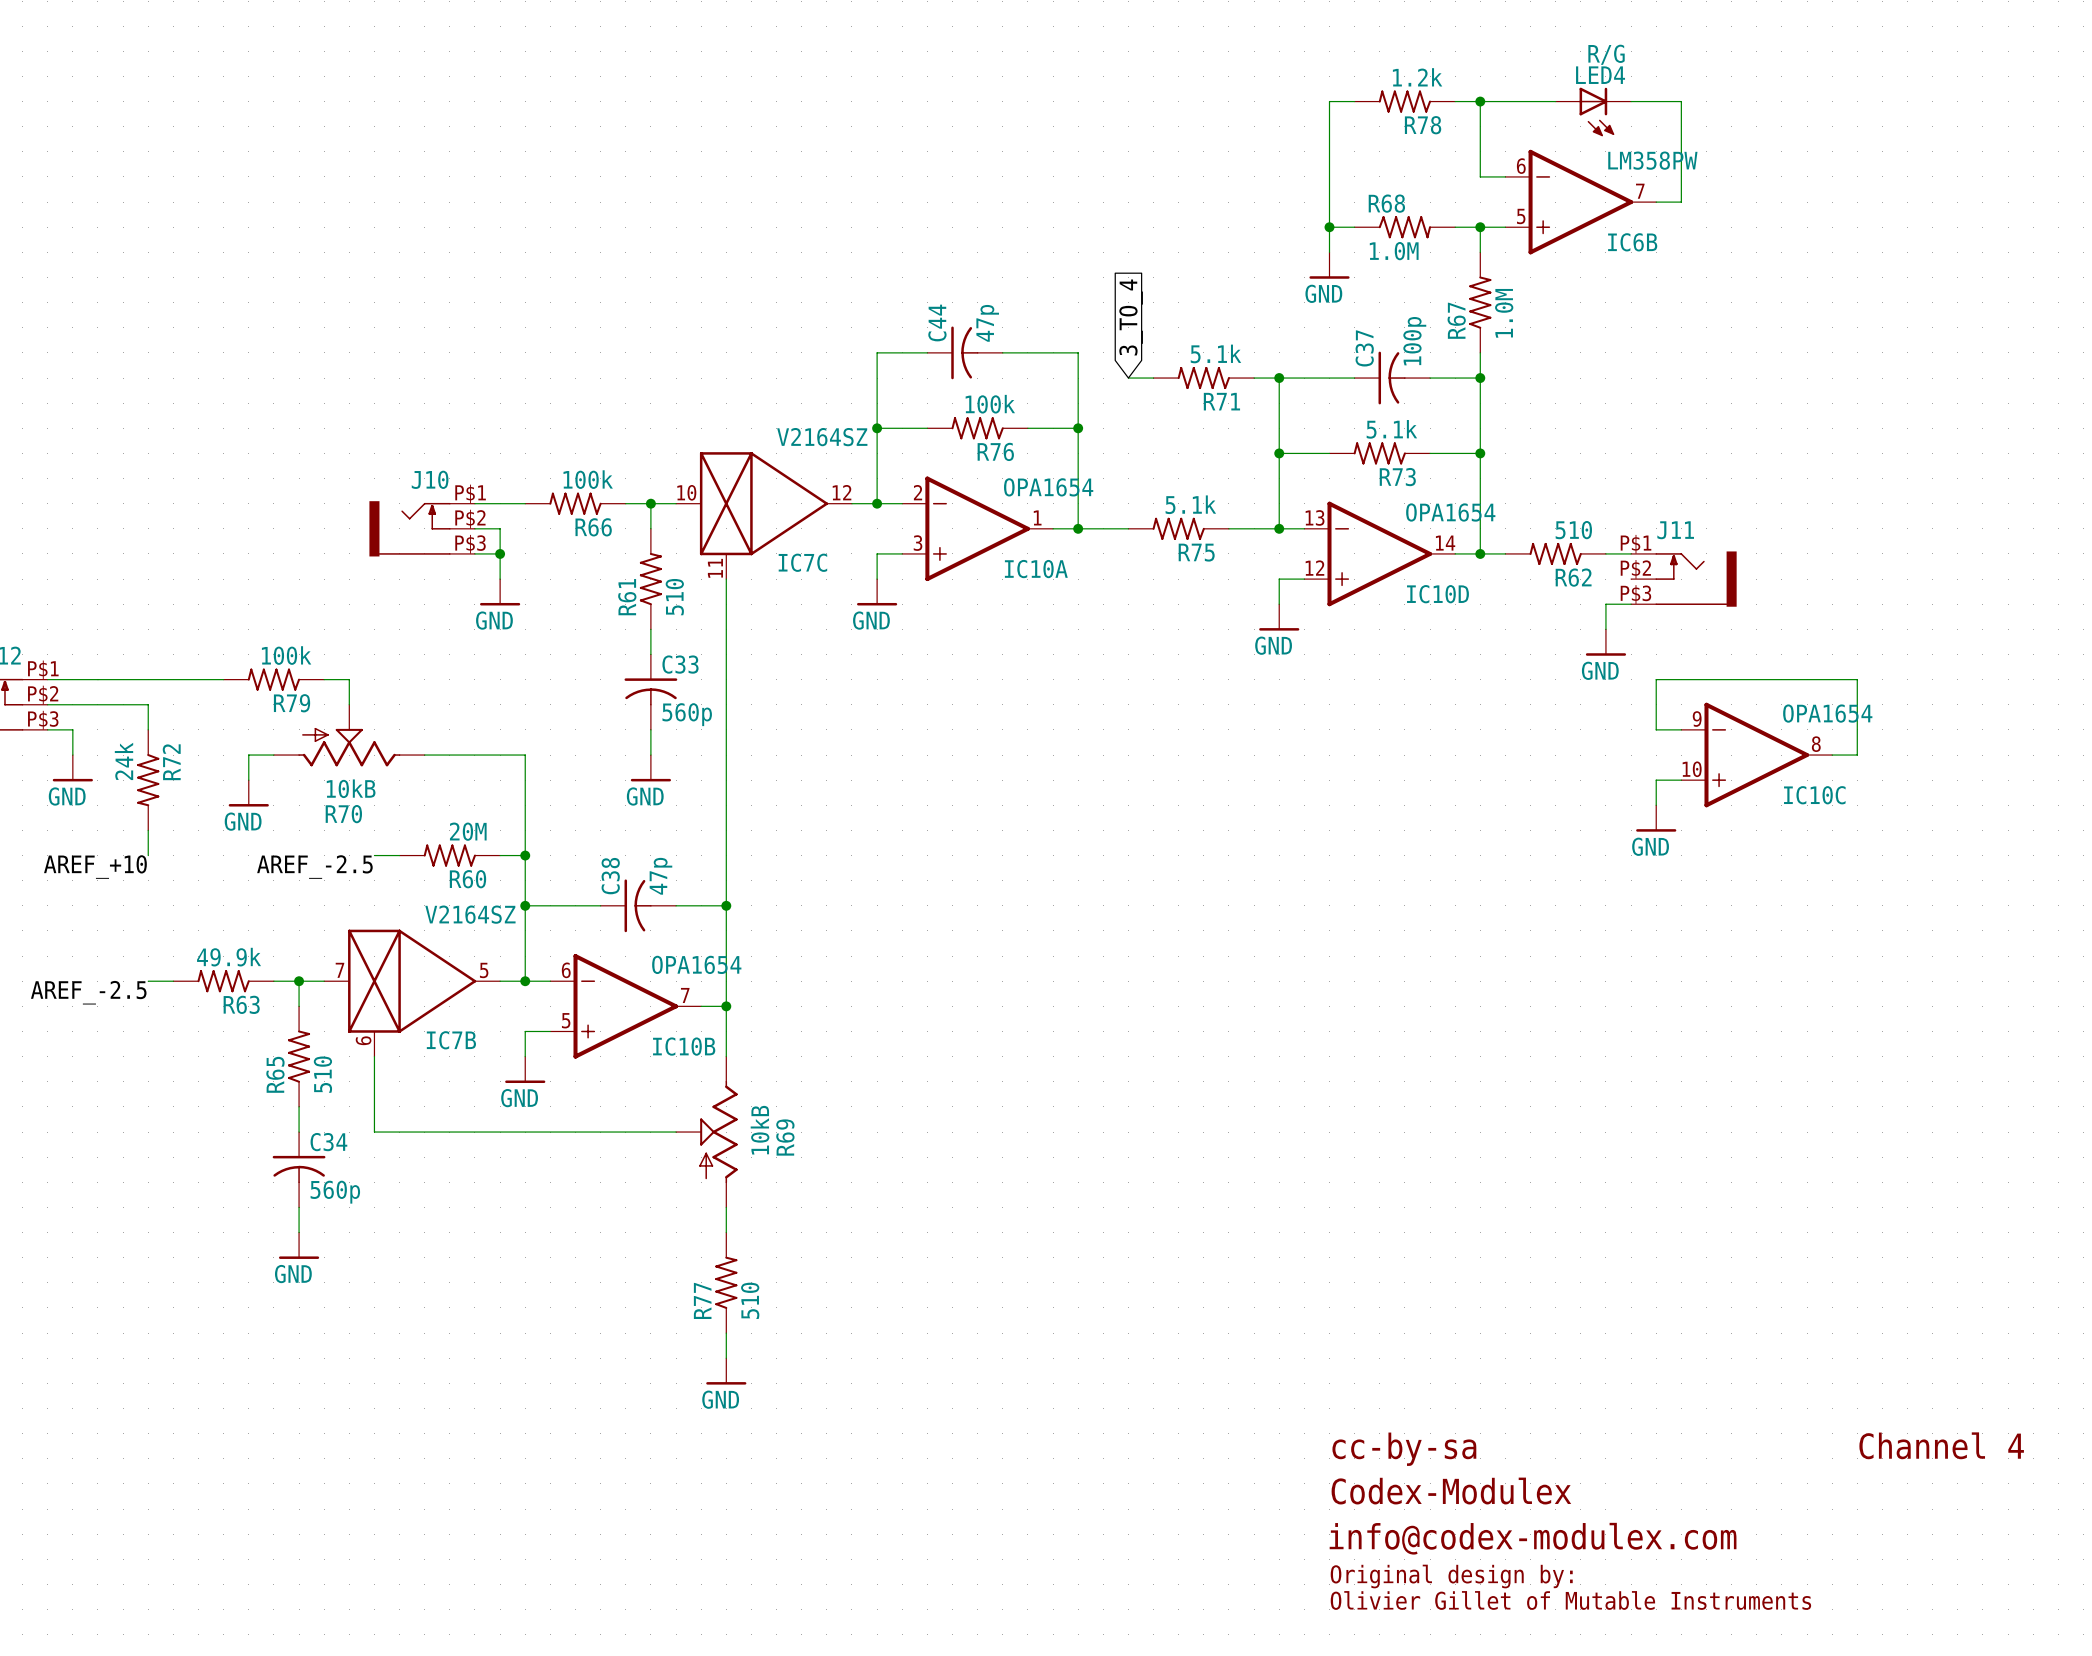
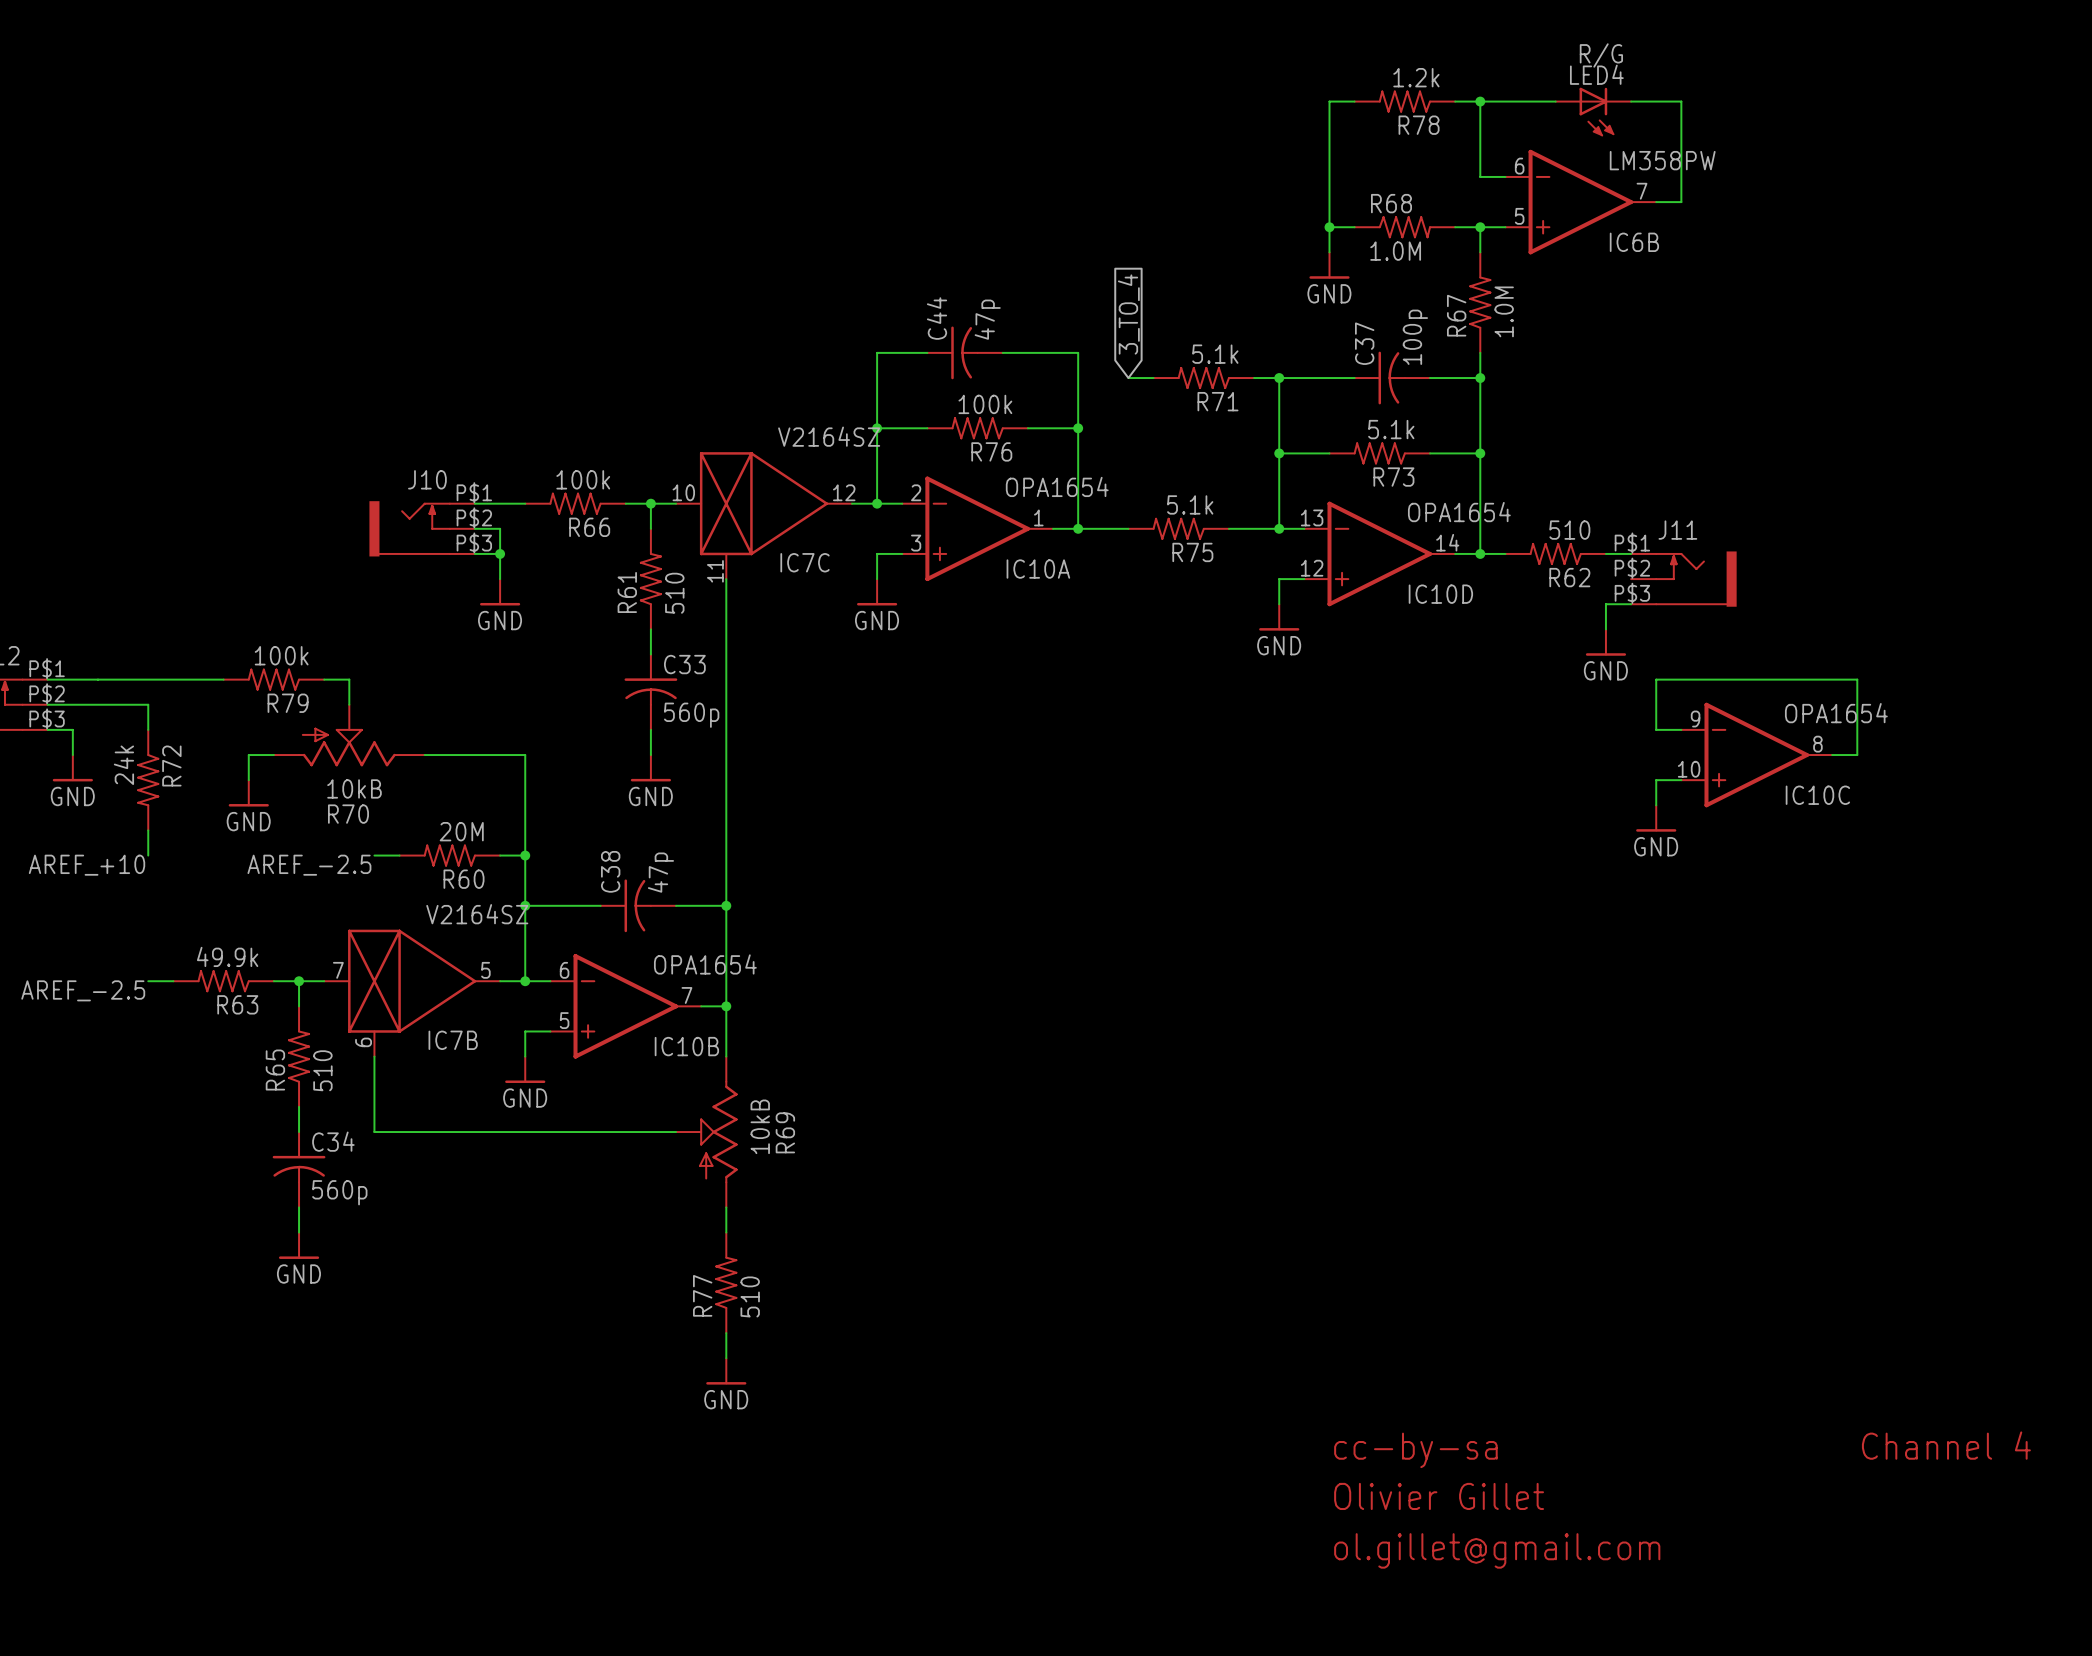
text: Codex-Modulex (1451, 1491) -> Olivier Gillet (1439, 1496)
text: info@codex-modulex.com (1533, 1538) -> none
text: none -> ol.gillet@gmail.com (1497, 1550)
text: Original design by: (1451, 1576) -> none
text: Olivier Gillet of Mutable Instruments (1570, 1600) -> none

